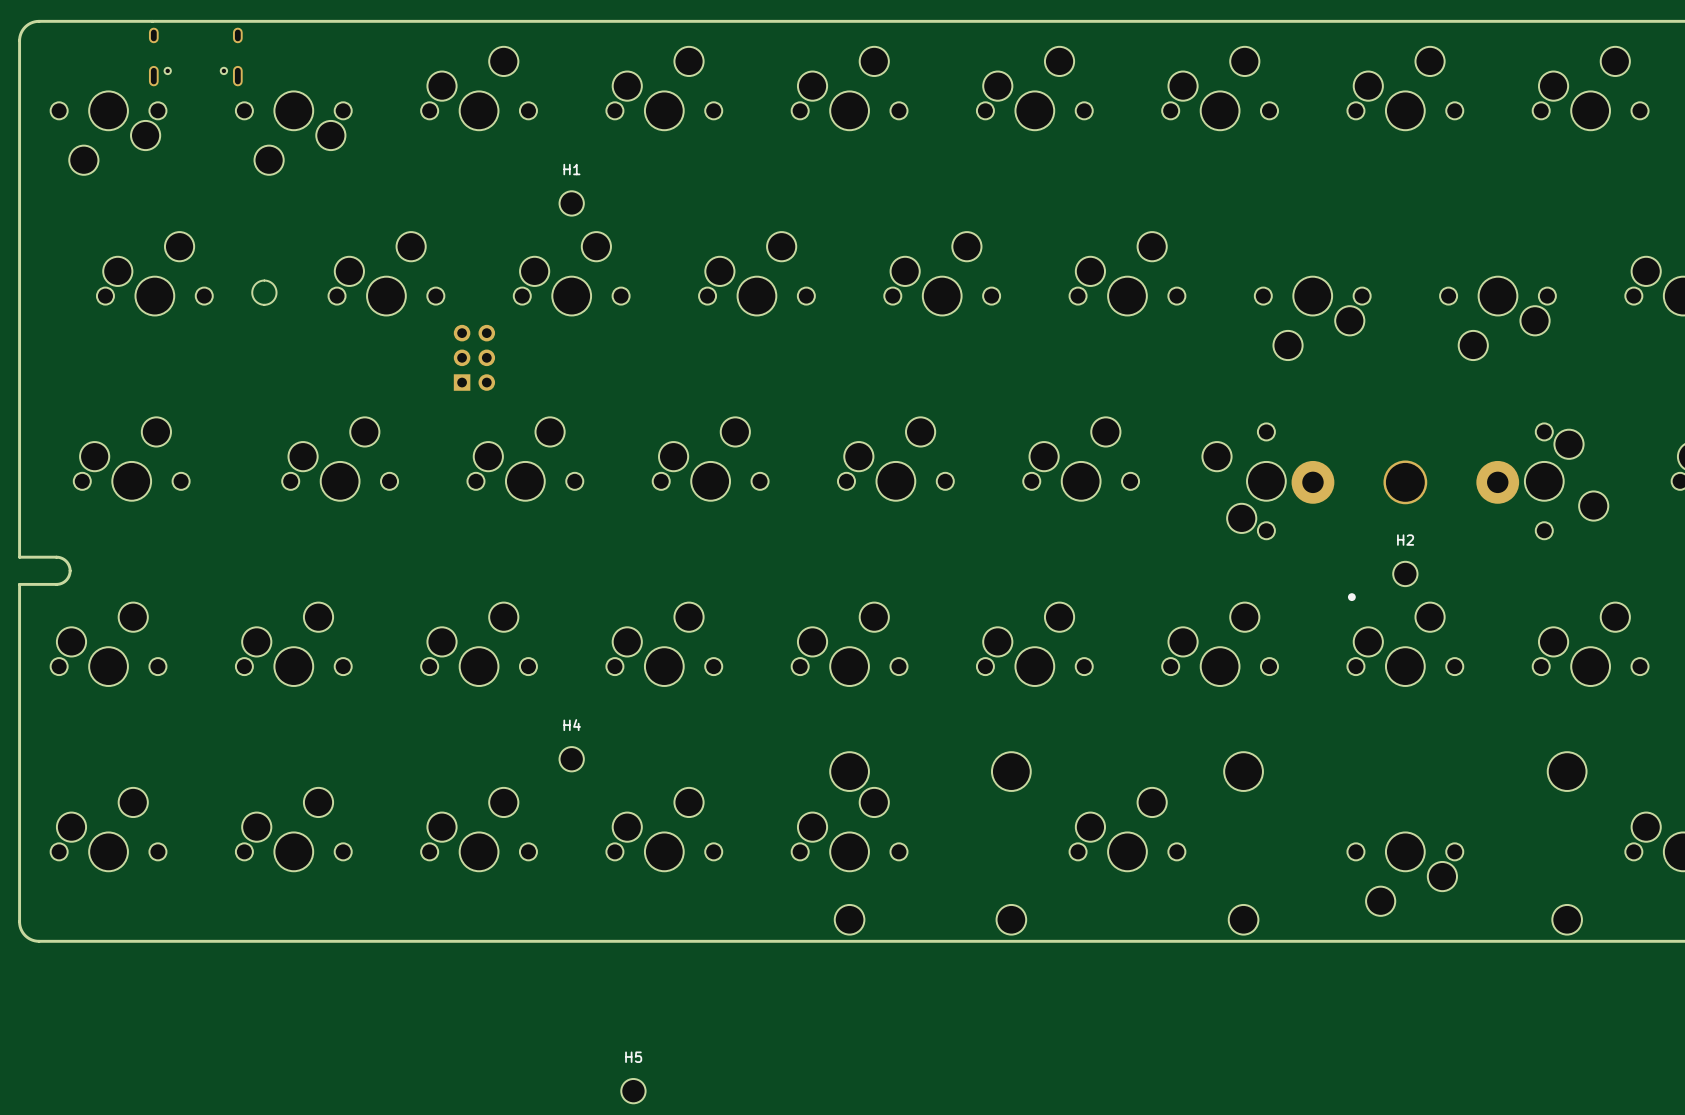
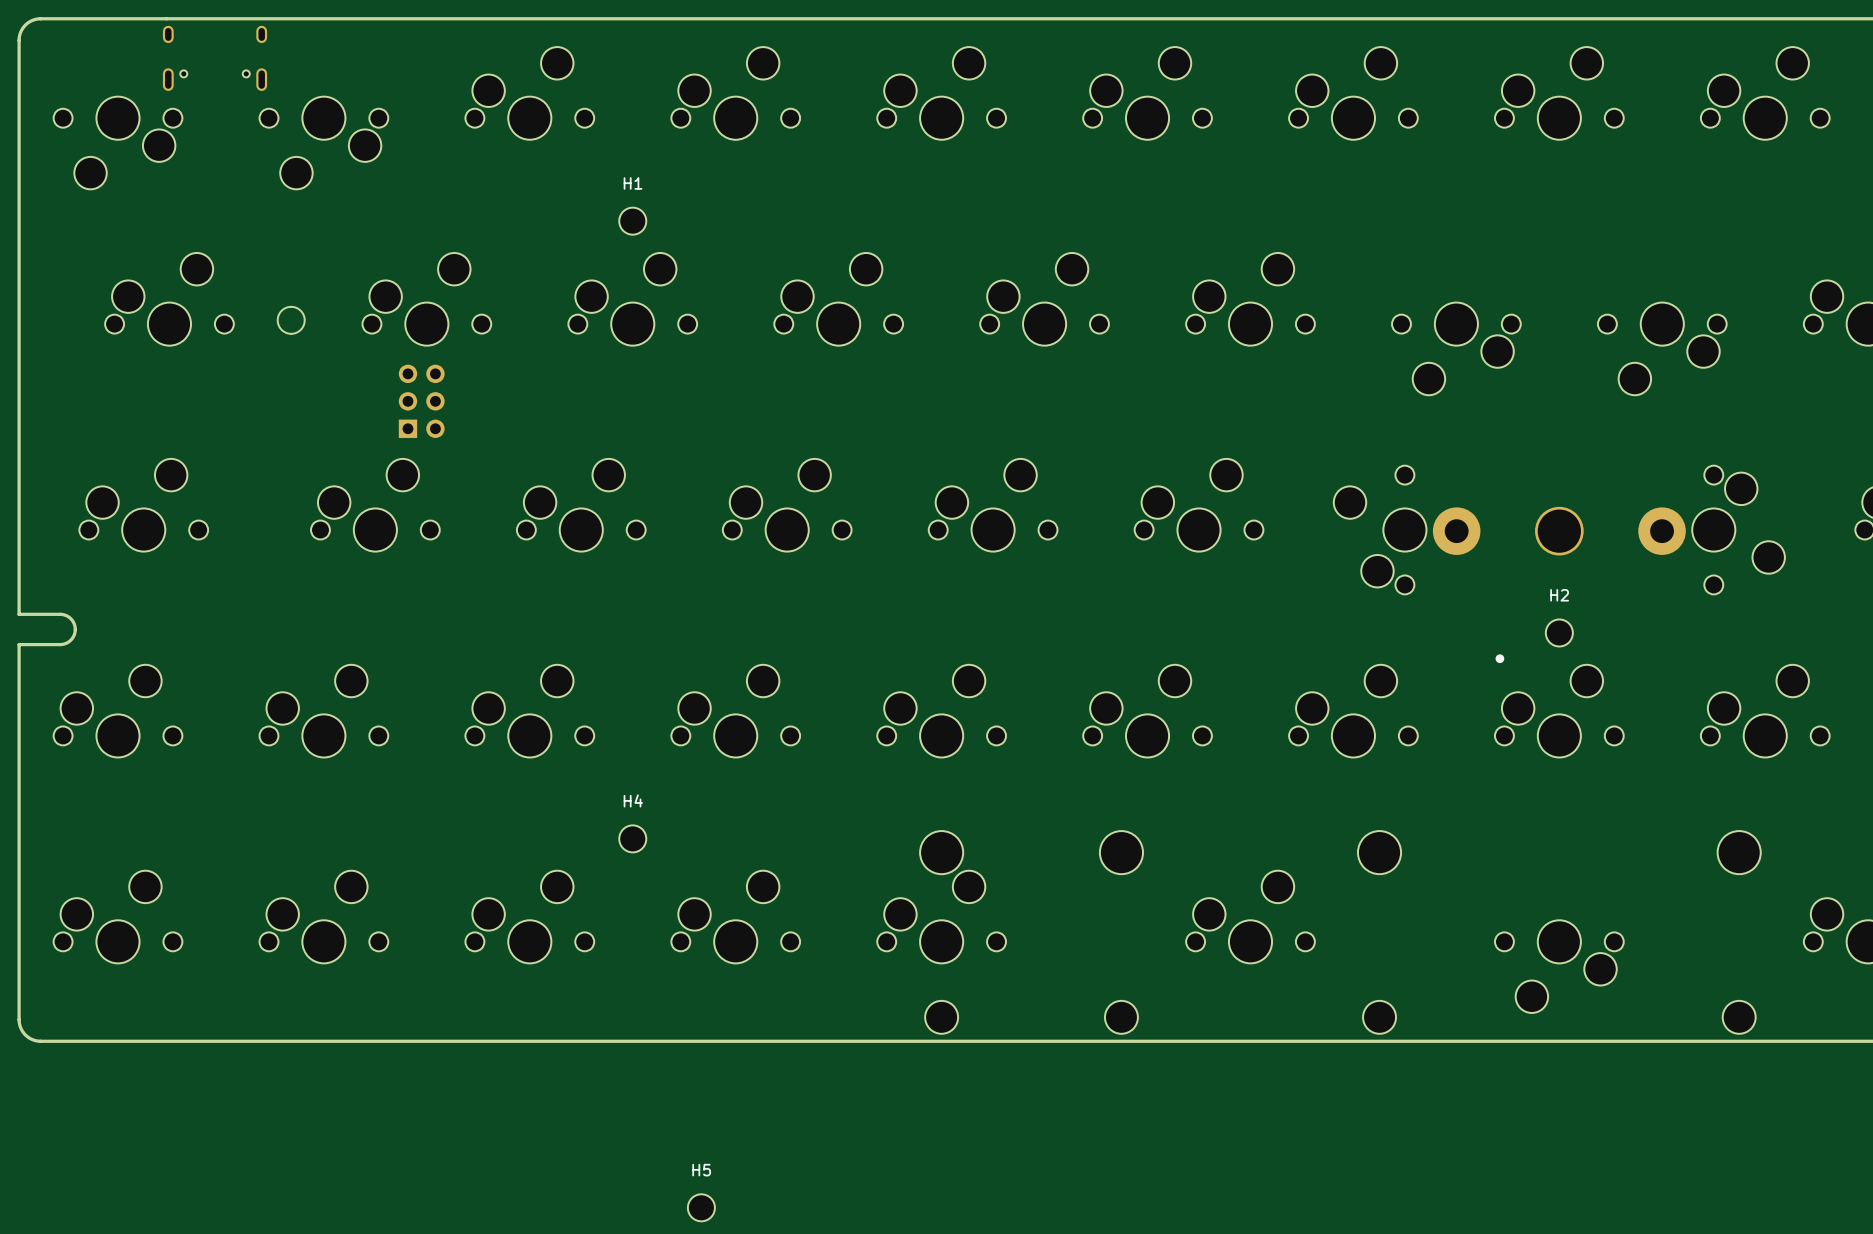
part position: (474, 357) -> (421, 401)

